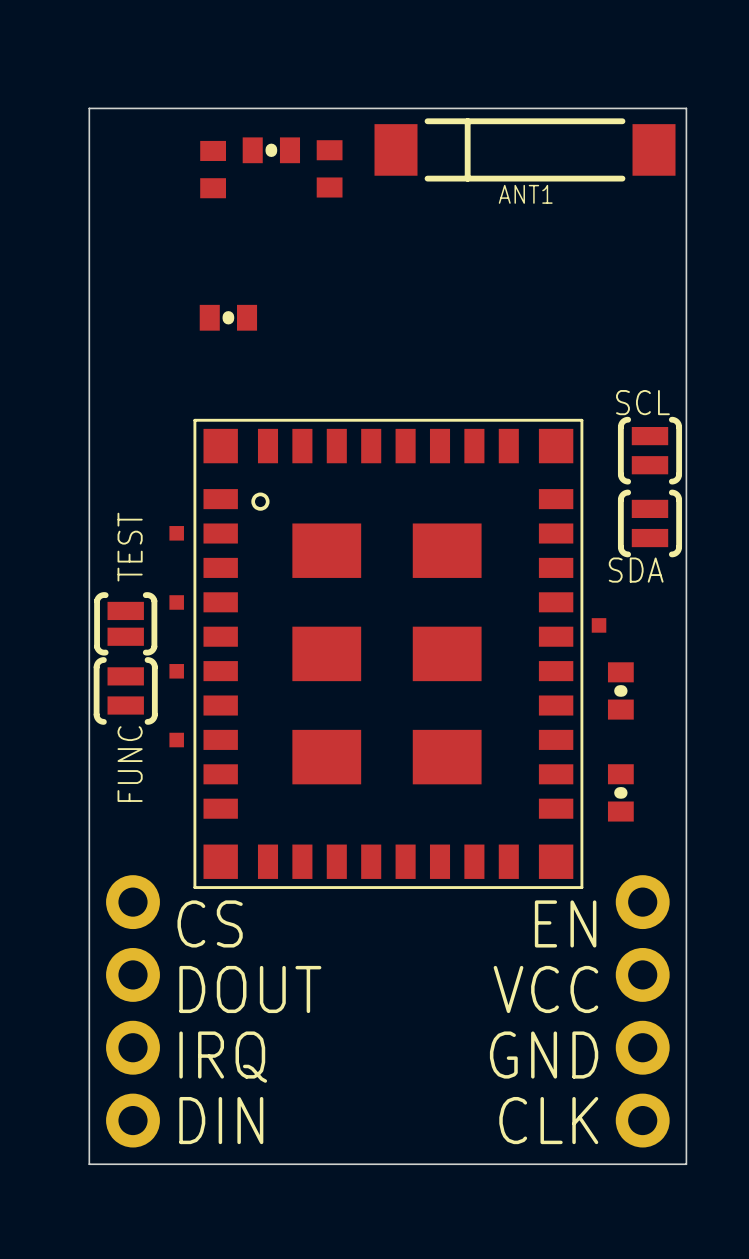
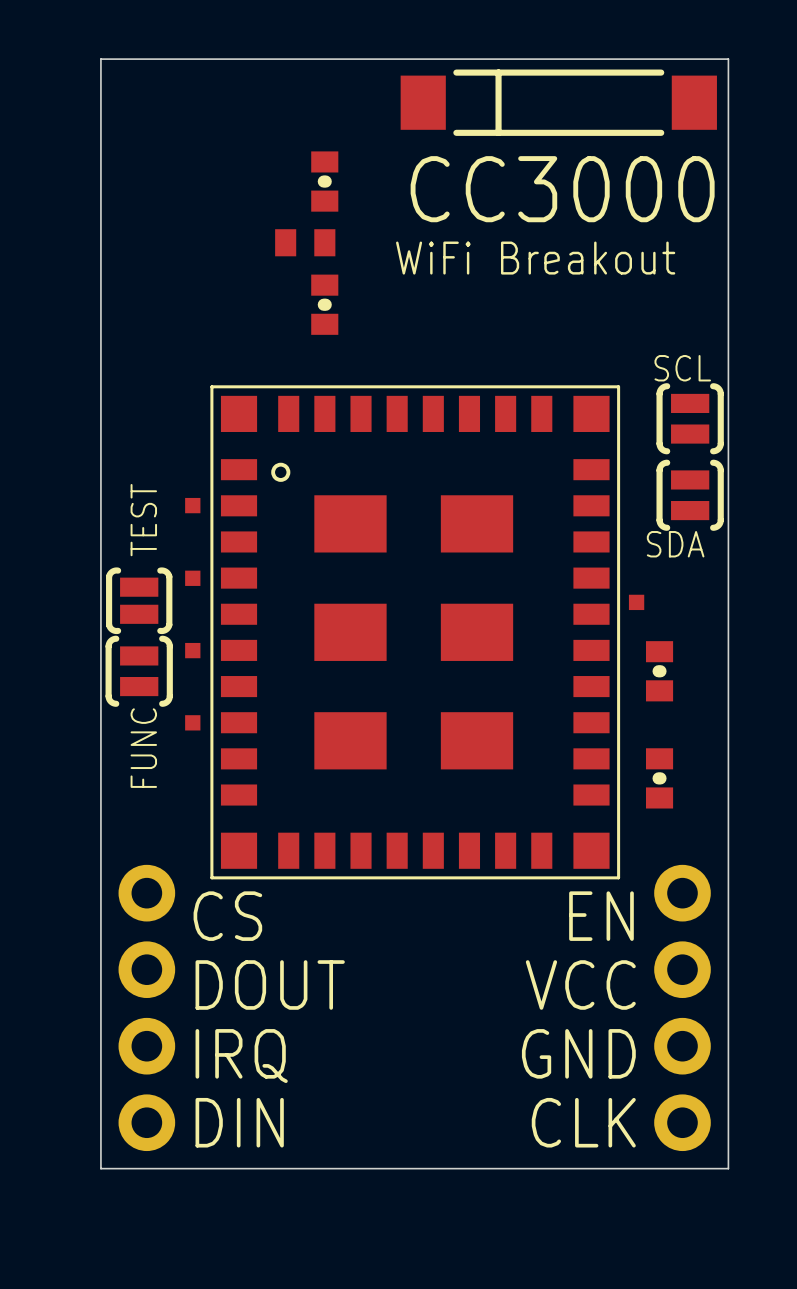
part: (271, 150) -> none
part: (329, 168) -> none
part: (213, 169) -> none
text: ANT1 (525, 194) -> none
part: none -> (324, 181)
text: none -> CC3000 (562, 189)
part: none -> (305, 242)
text: none -> WiFi Breakout (535, 258)
part: (228, 317) -> none
part: none -> (324, 304)

